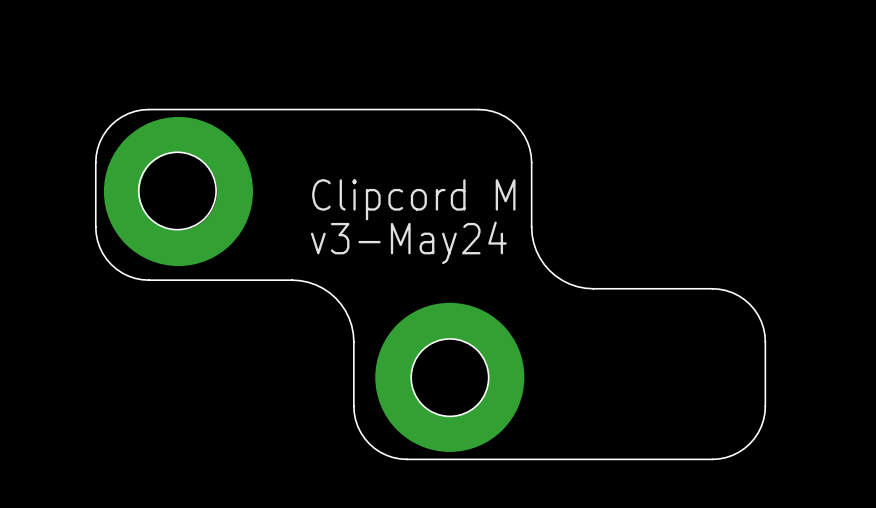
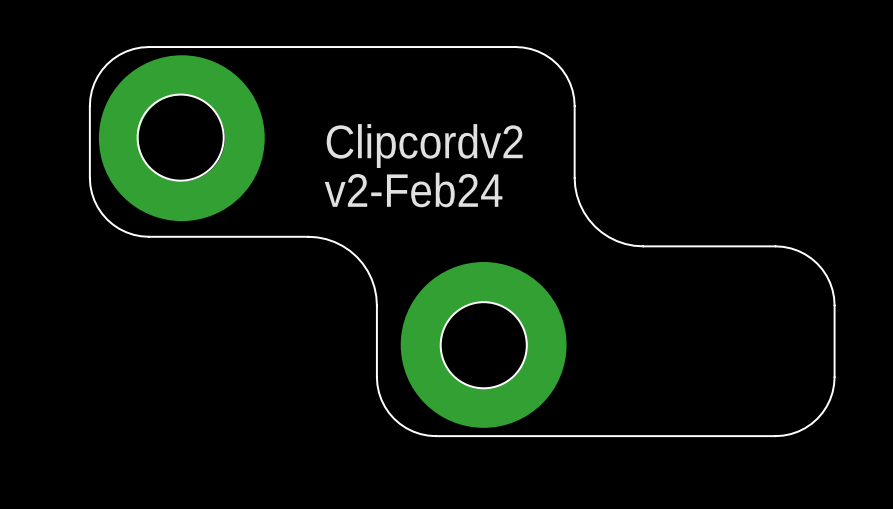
text: Clipcord M (413, 199) -> Clipcordv2 (424, 146)
text: v3-May24 (408, 242) -> v2-Feb24 (413, 189)

